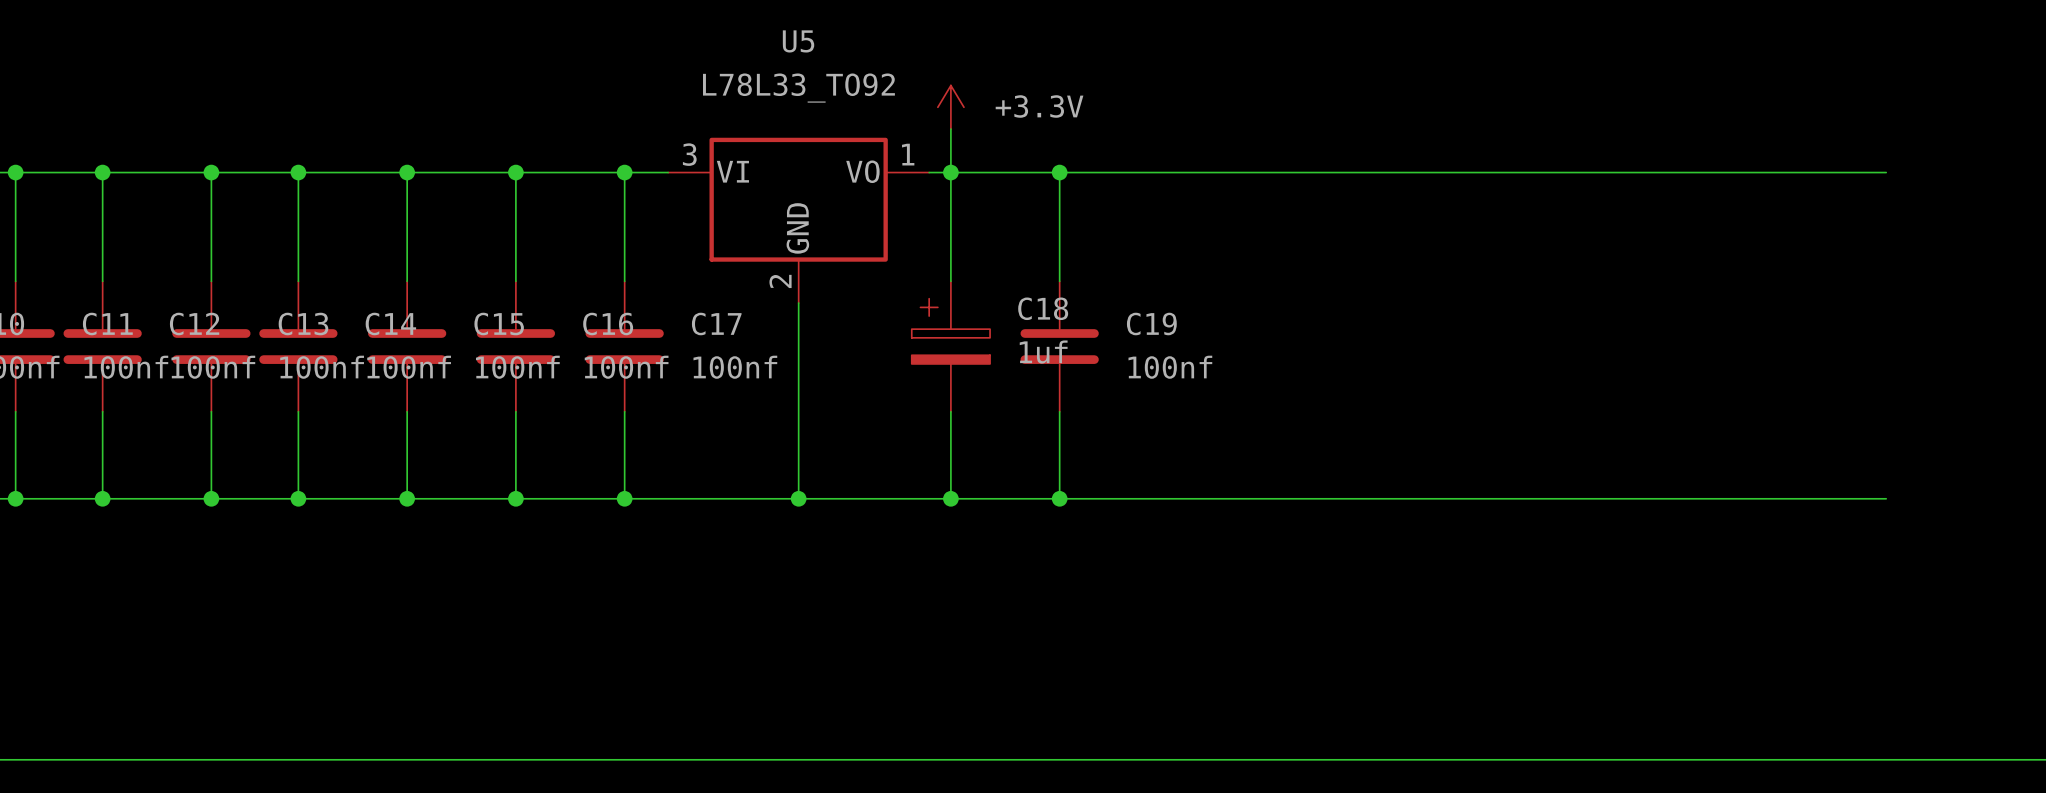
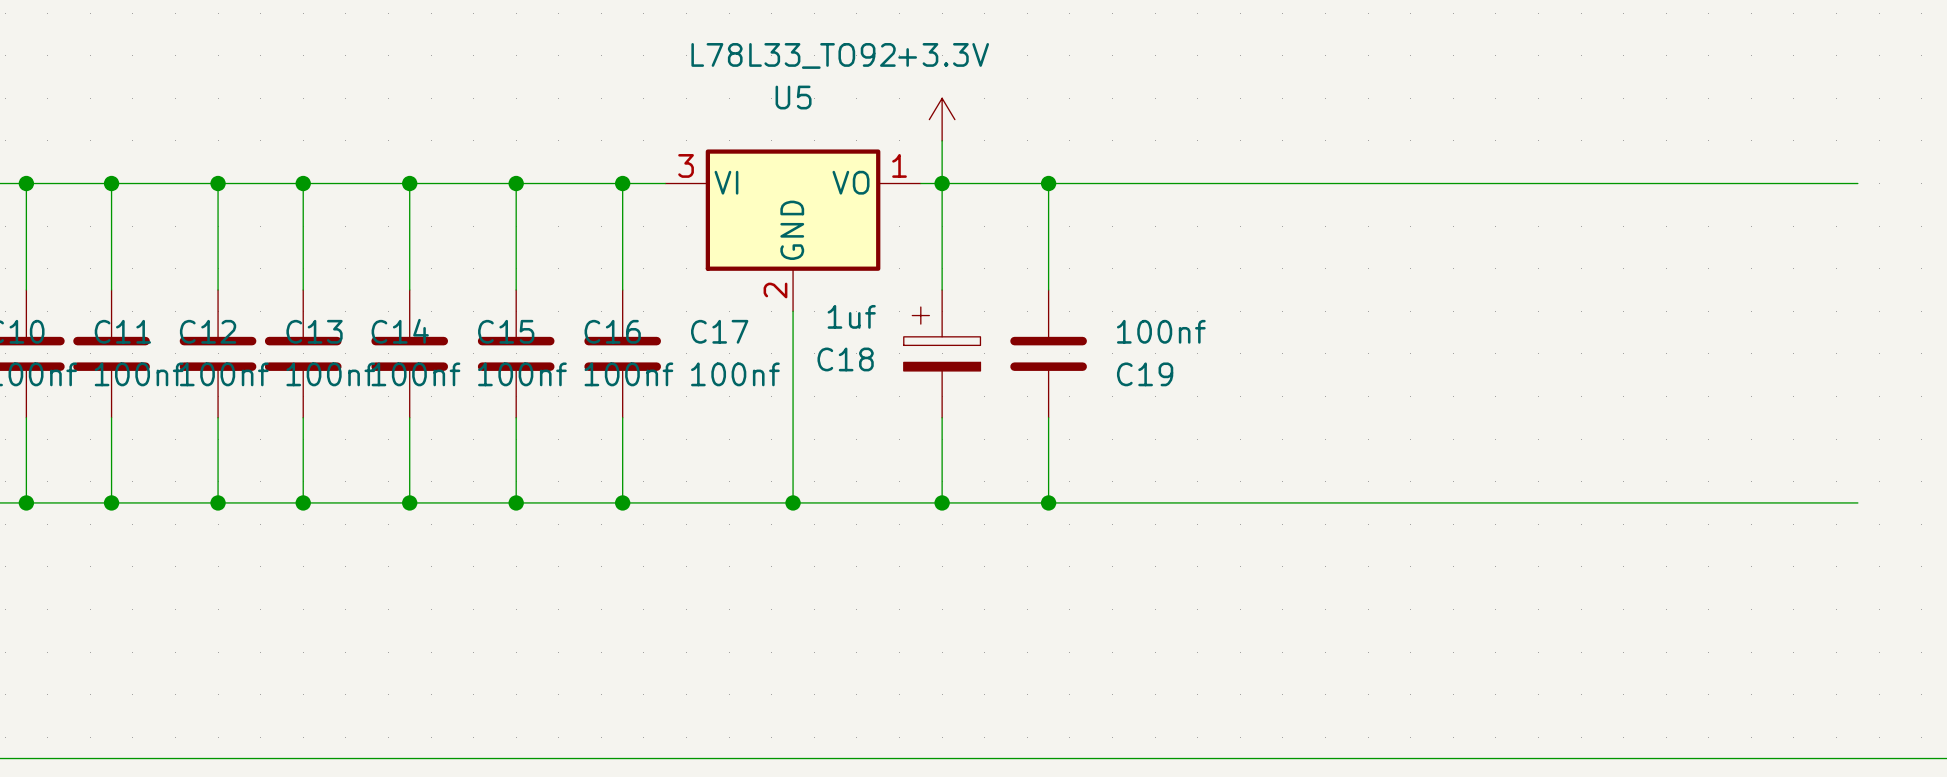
U5 name position: U5 (798, 41) -> U5 (793, 97)
U5 value position: L78L33_TO92 (798, 88) -> L78L33_TO92 (793, 55)
power symbol text position: +3.3V (1039, 106) -> +3.3V (943, 54)
C18 name position: C18 (1043, 308) -> C18 (845, 359)
C19 name position: C19 (1151, 324) -> C19 (1145, 374)
C18 value position: 1uf (1043, 352) -> 1uf (851, 316)
C19 value position: 100nf (1170, 367) -> 100nf (1161, 331)

